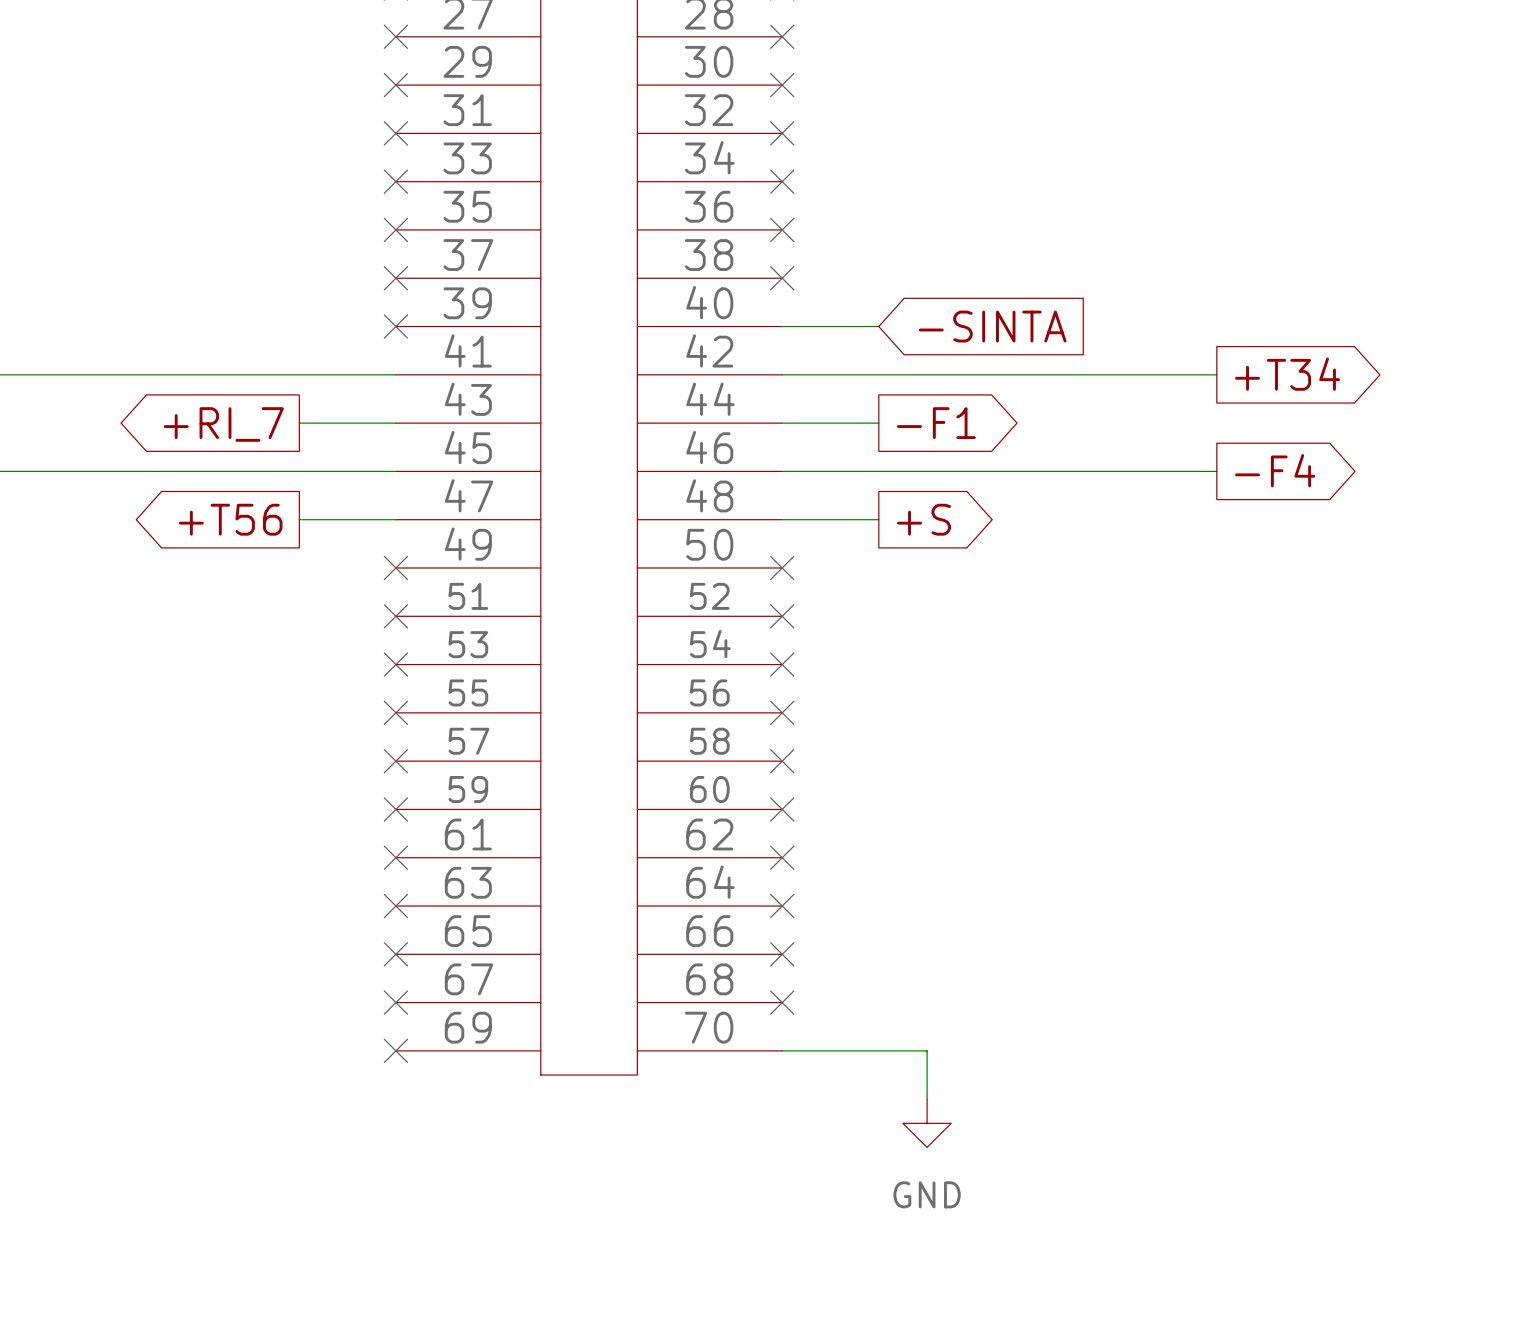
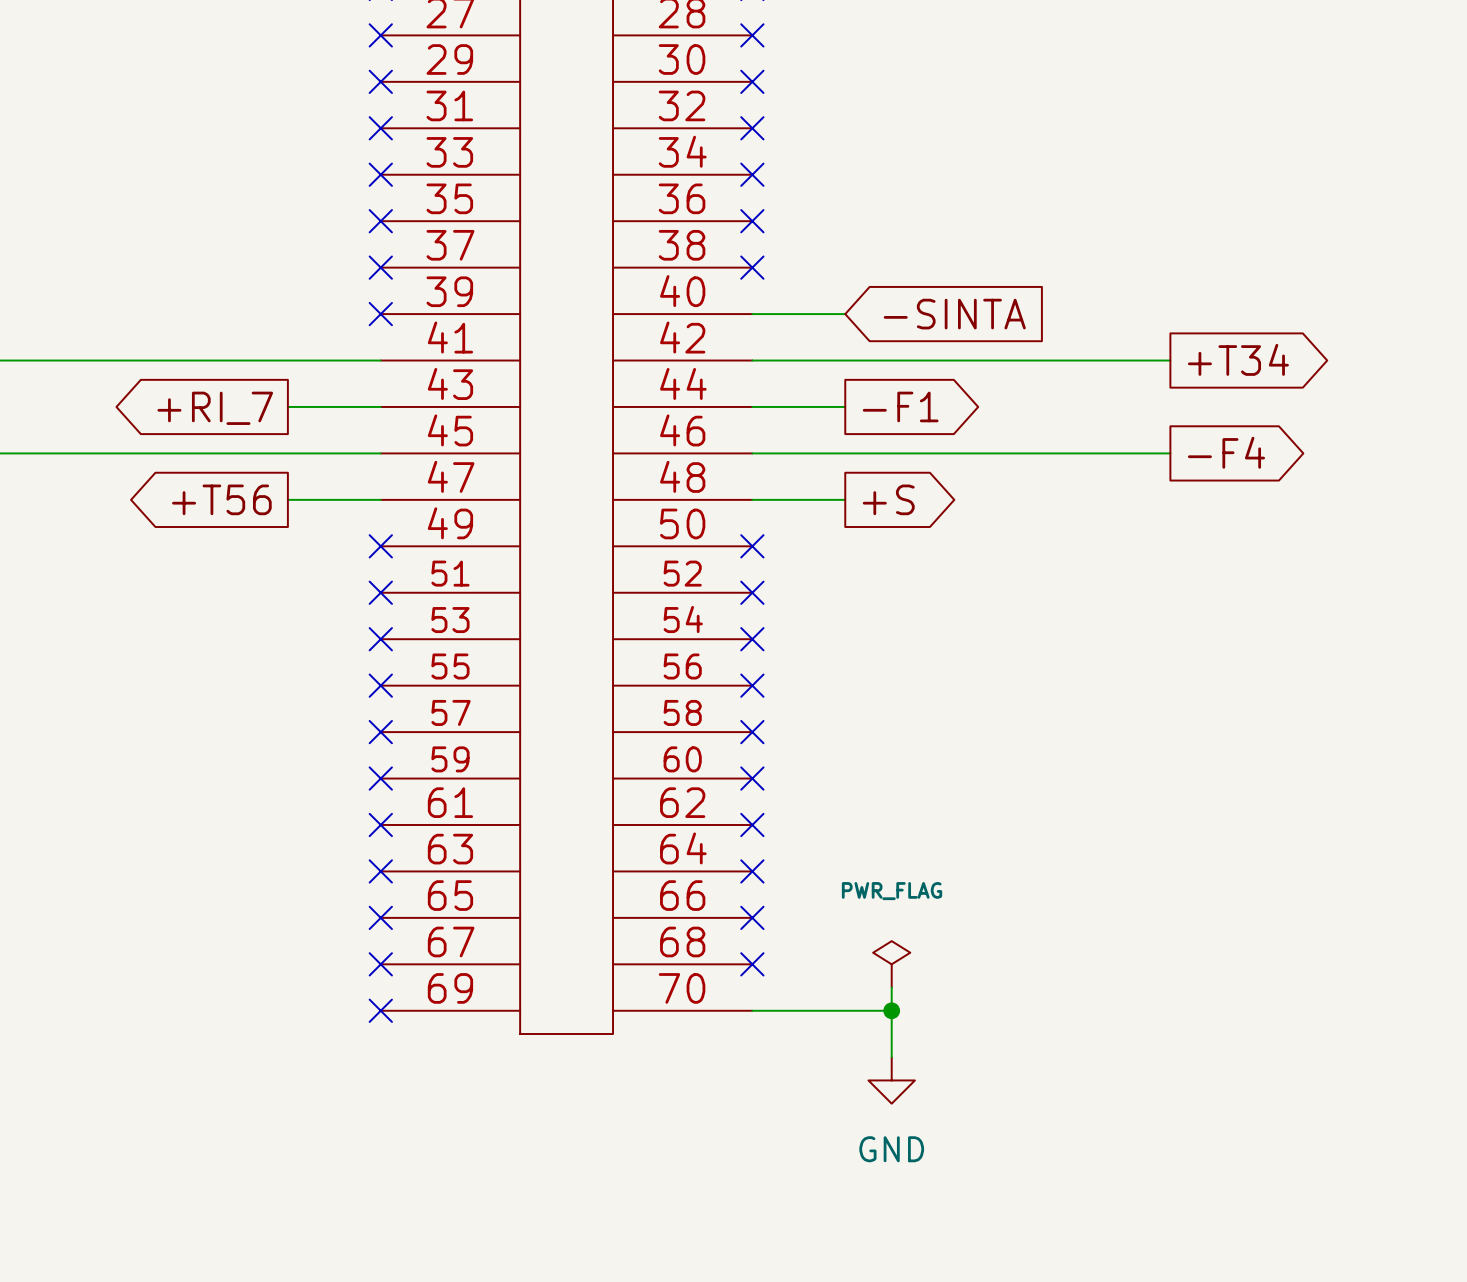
power symbol: none -> PWR_FLAG (891, 964)
wire: none -> (891, 987) (891, 1010)
junction: none -> (891, 1010)

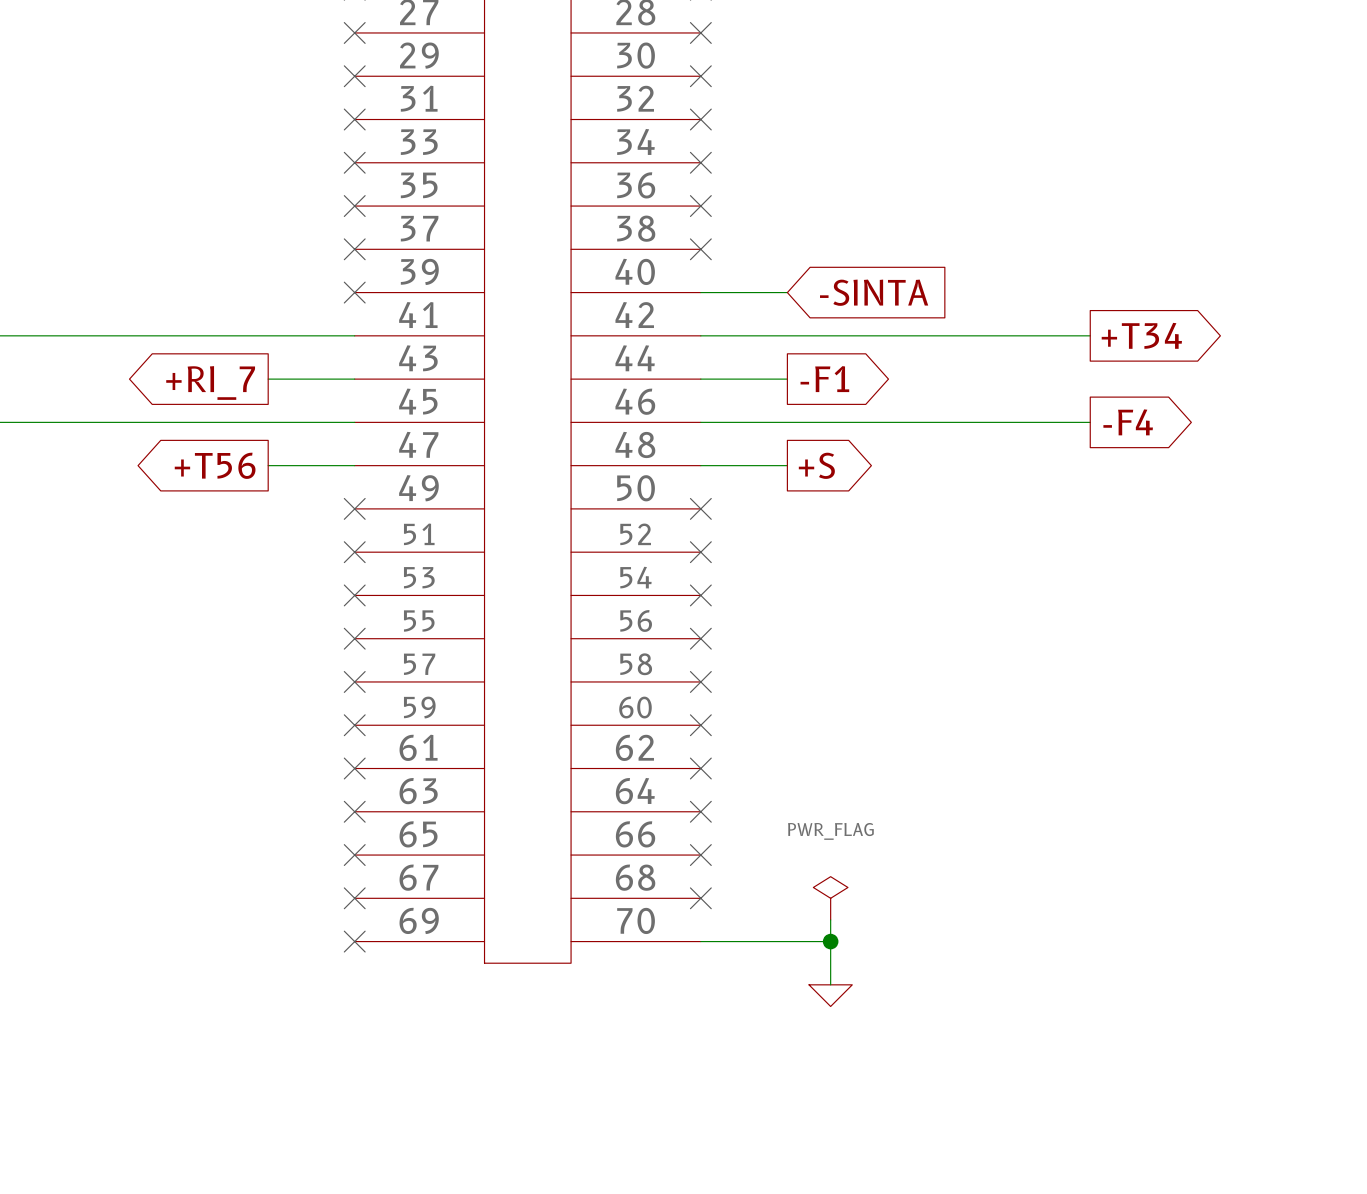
power symbol shape: [868, 1057, 915, 1104] -> [809, 984, 853, 1007]
power symbol text: GND (891, 1149) -> none

